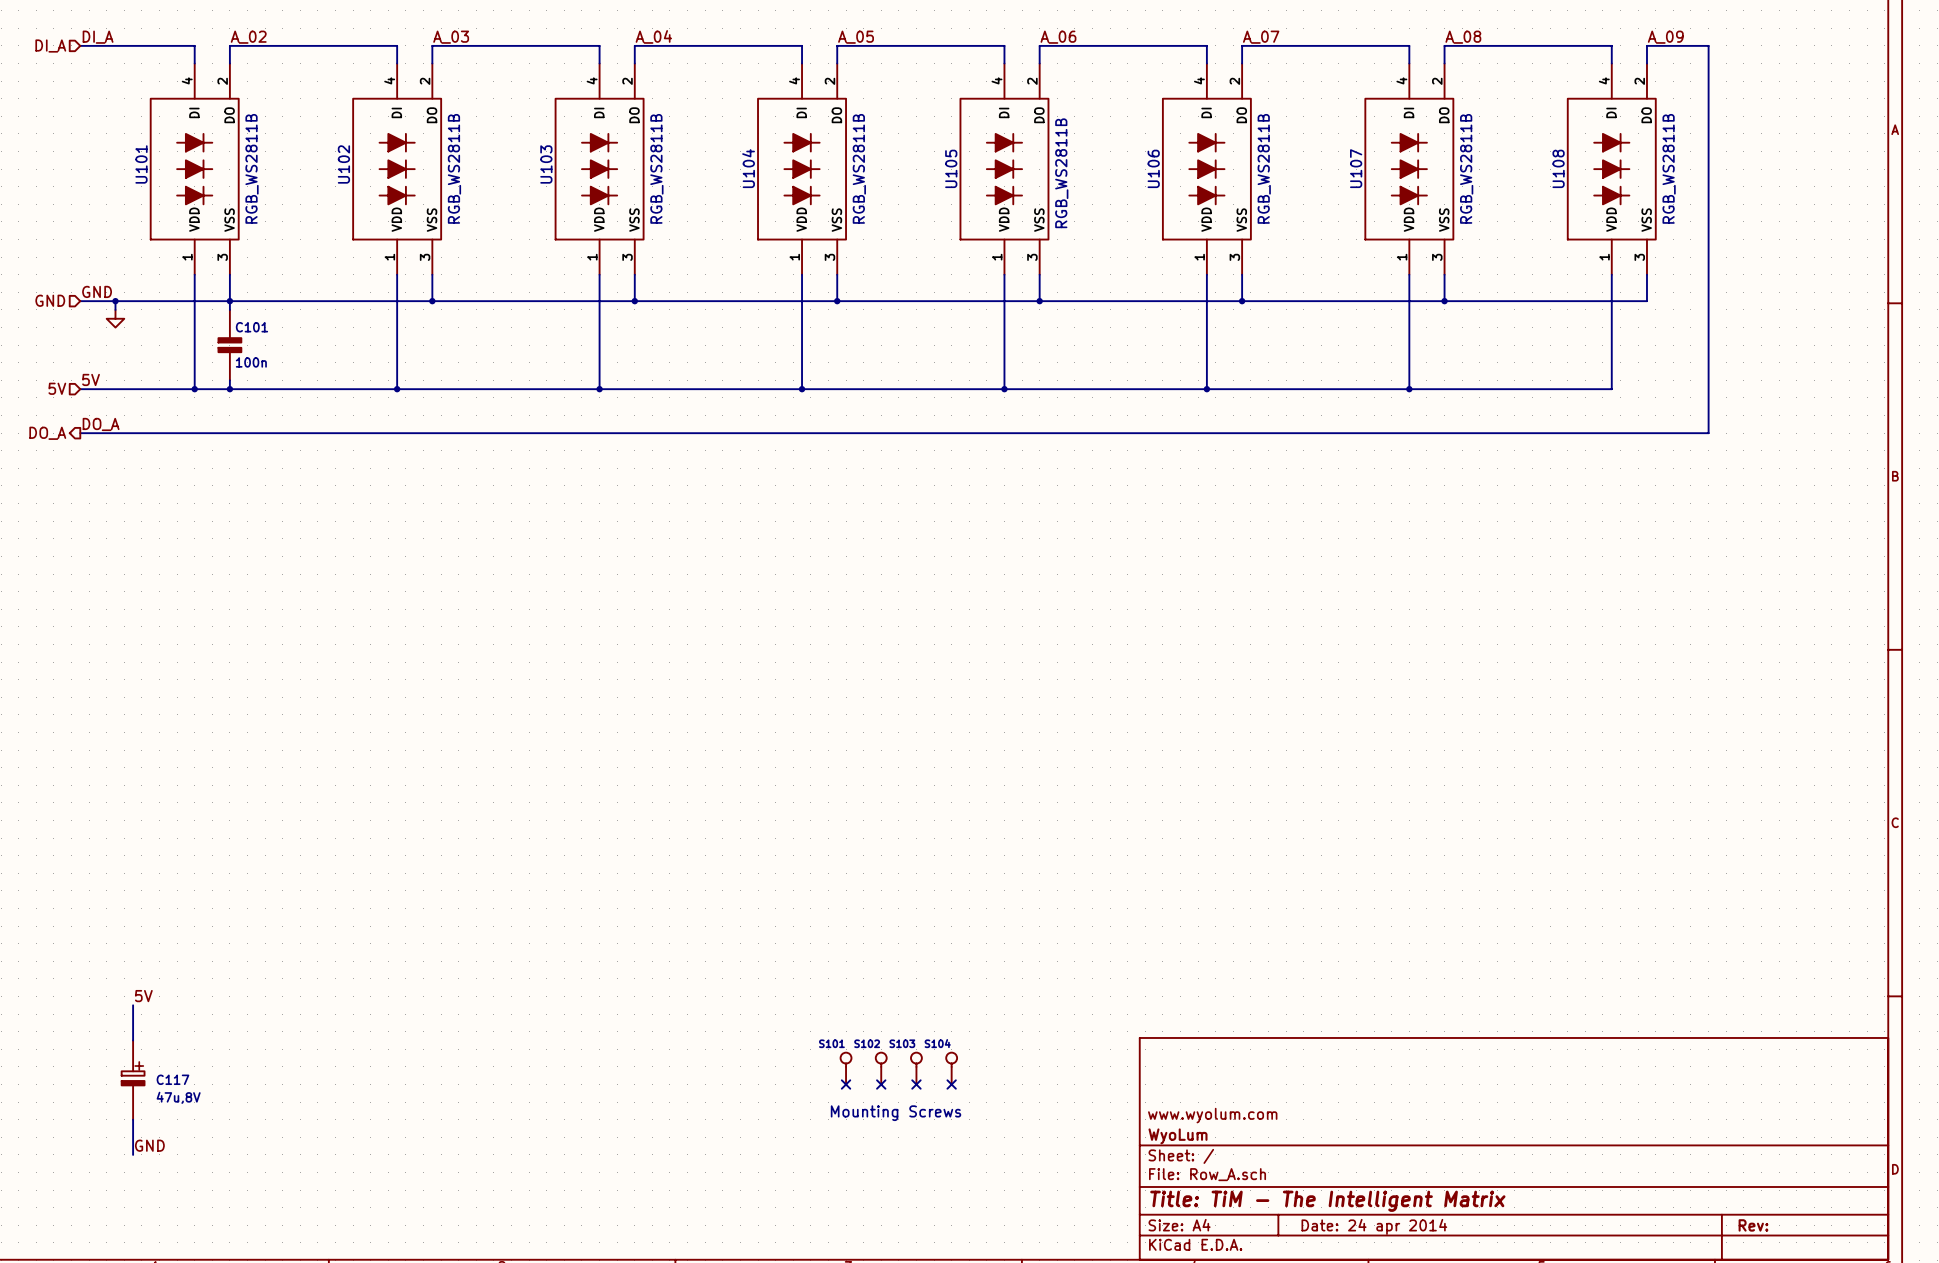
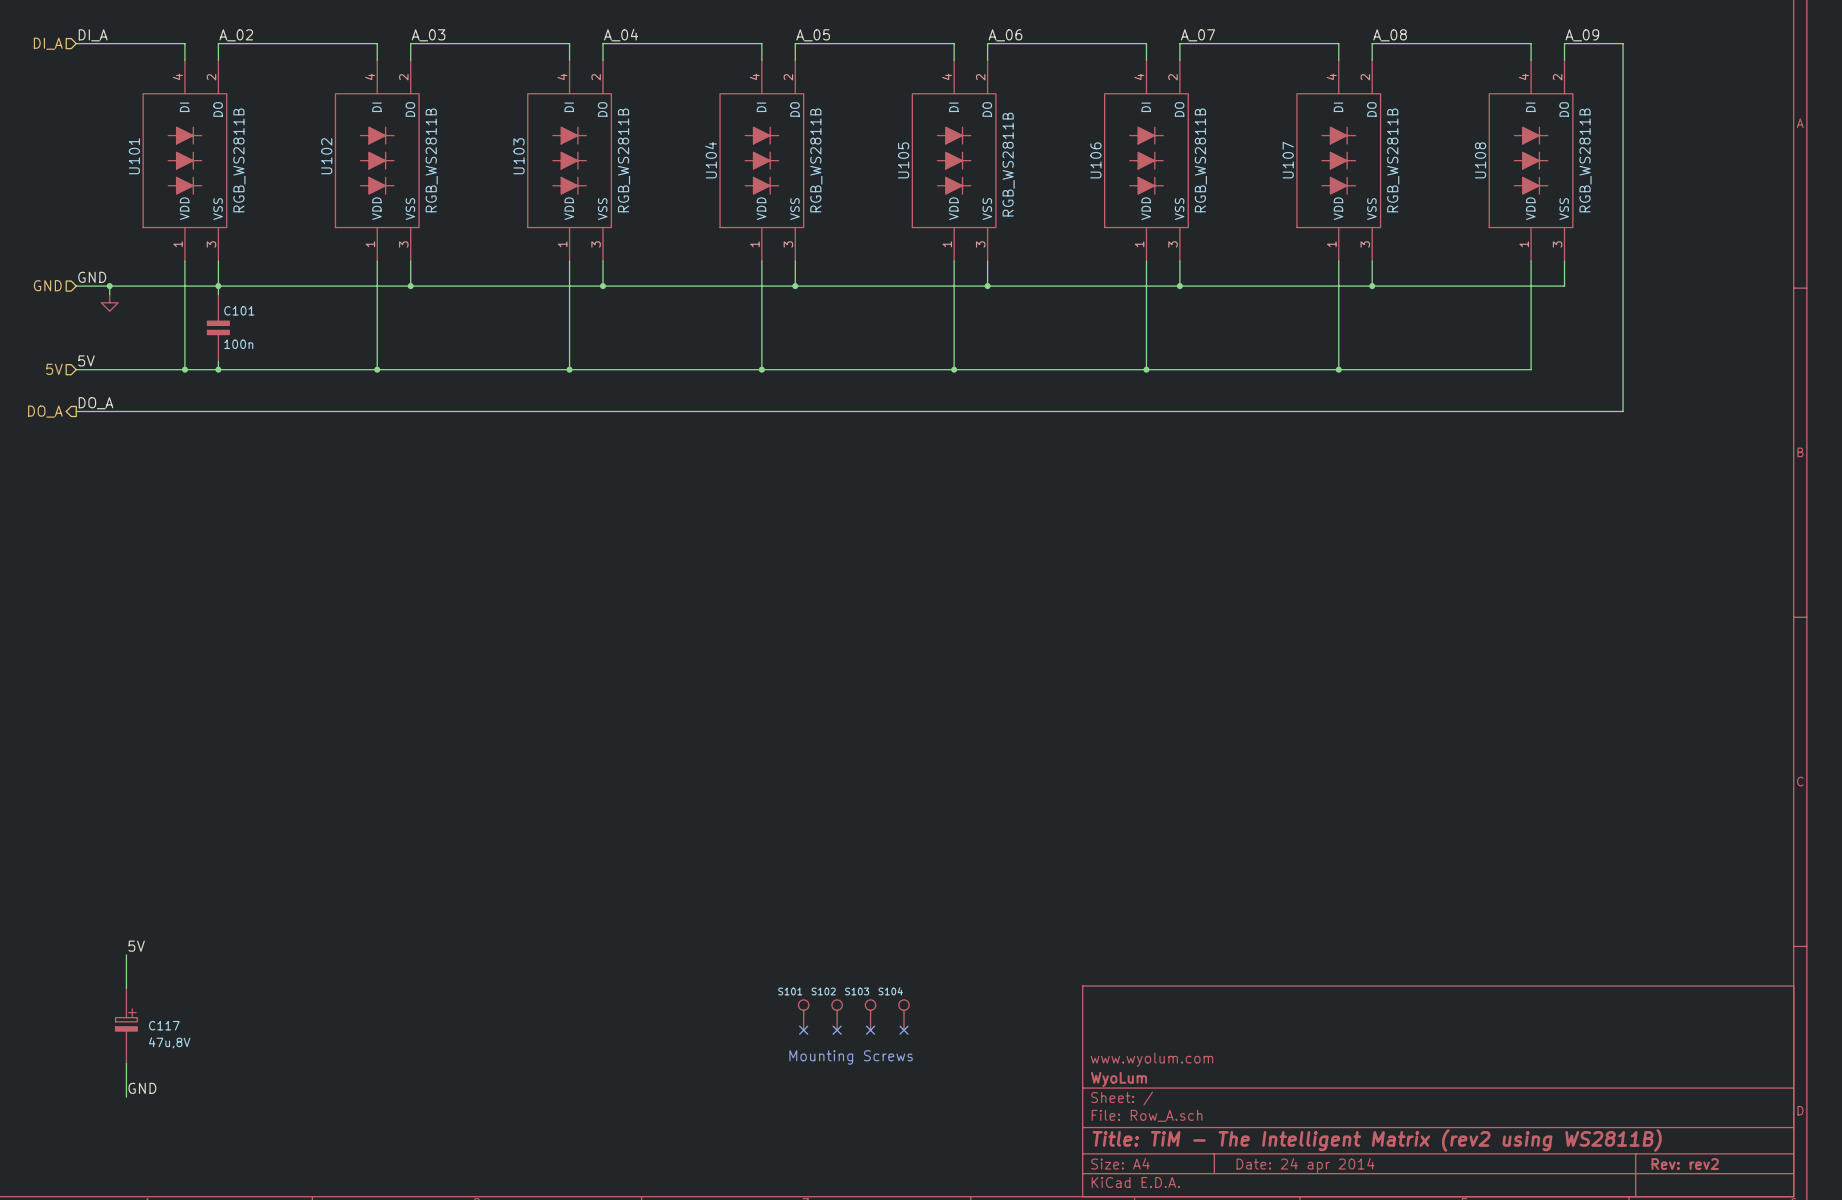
title block: Title: TiM - The Intelligent Matrix (1327, 1201) -> Title: TiM - The Intelligent Matrix (rev2 using WS2811B) (1377, 1140)
title block: Rev: (1753, 1225) -> Rev: rev2 (1685, 1164)

